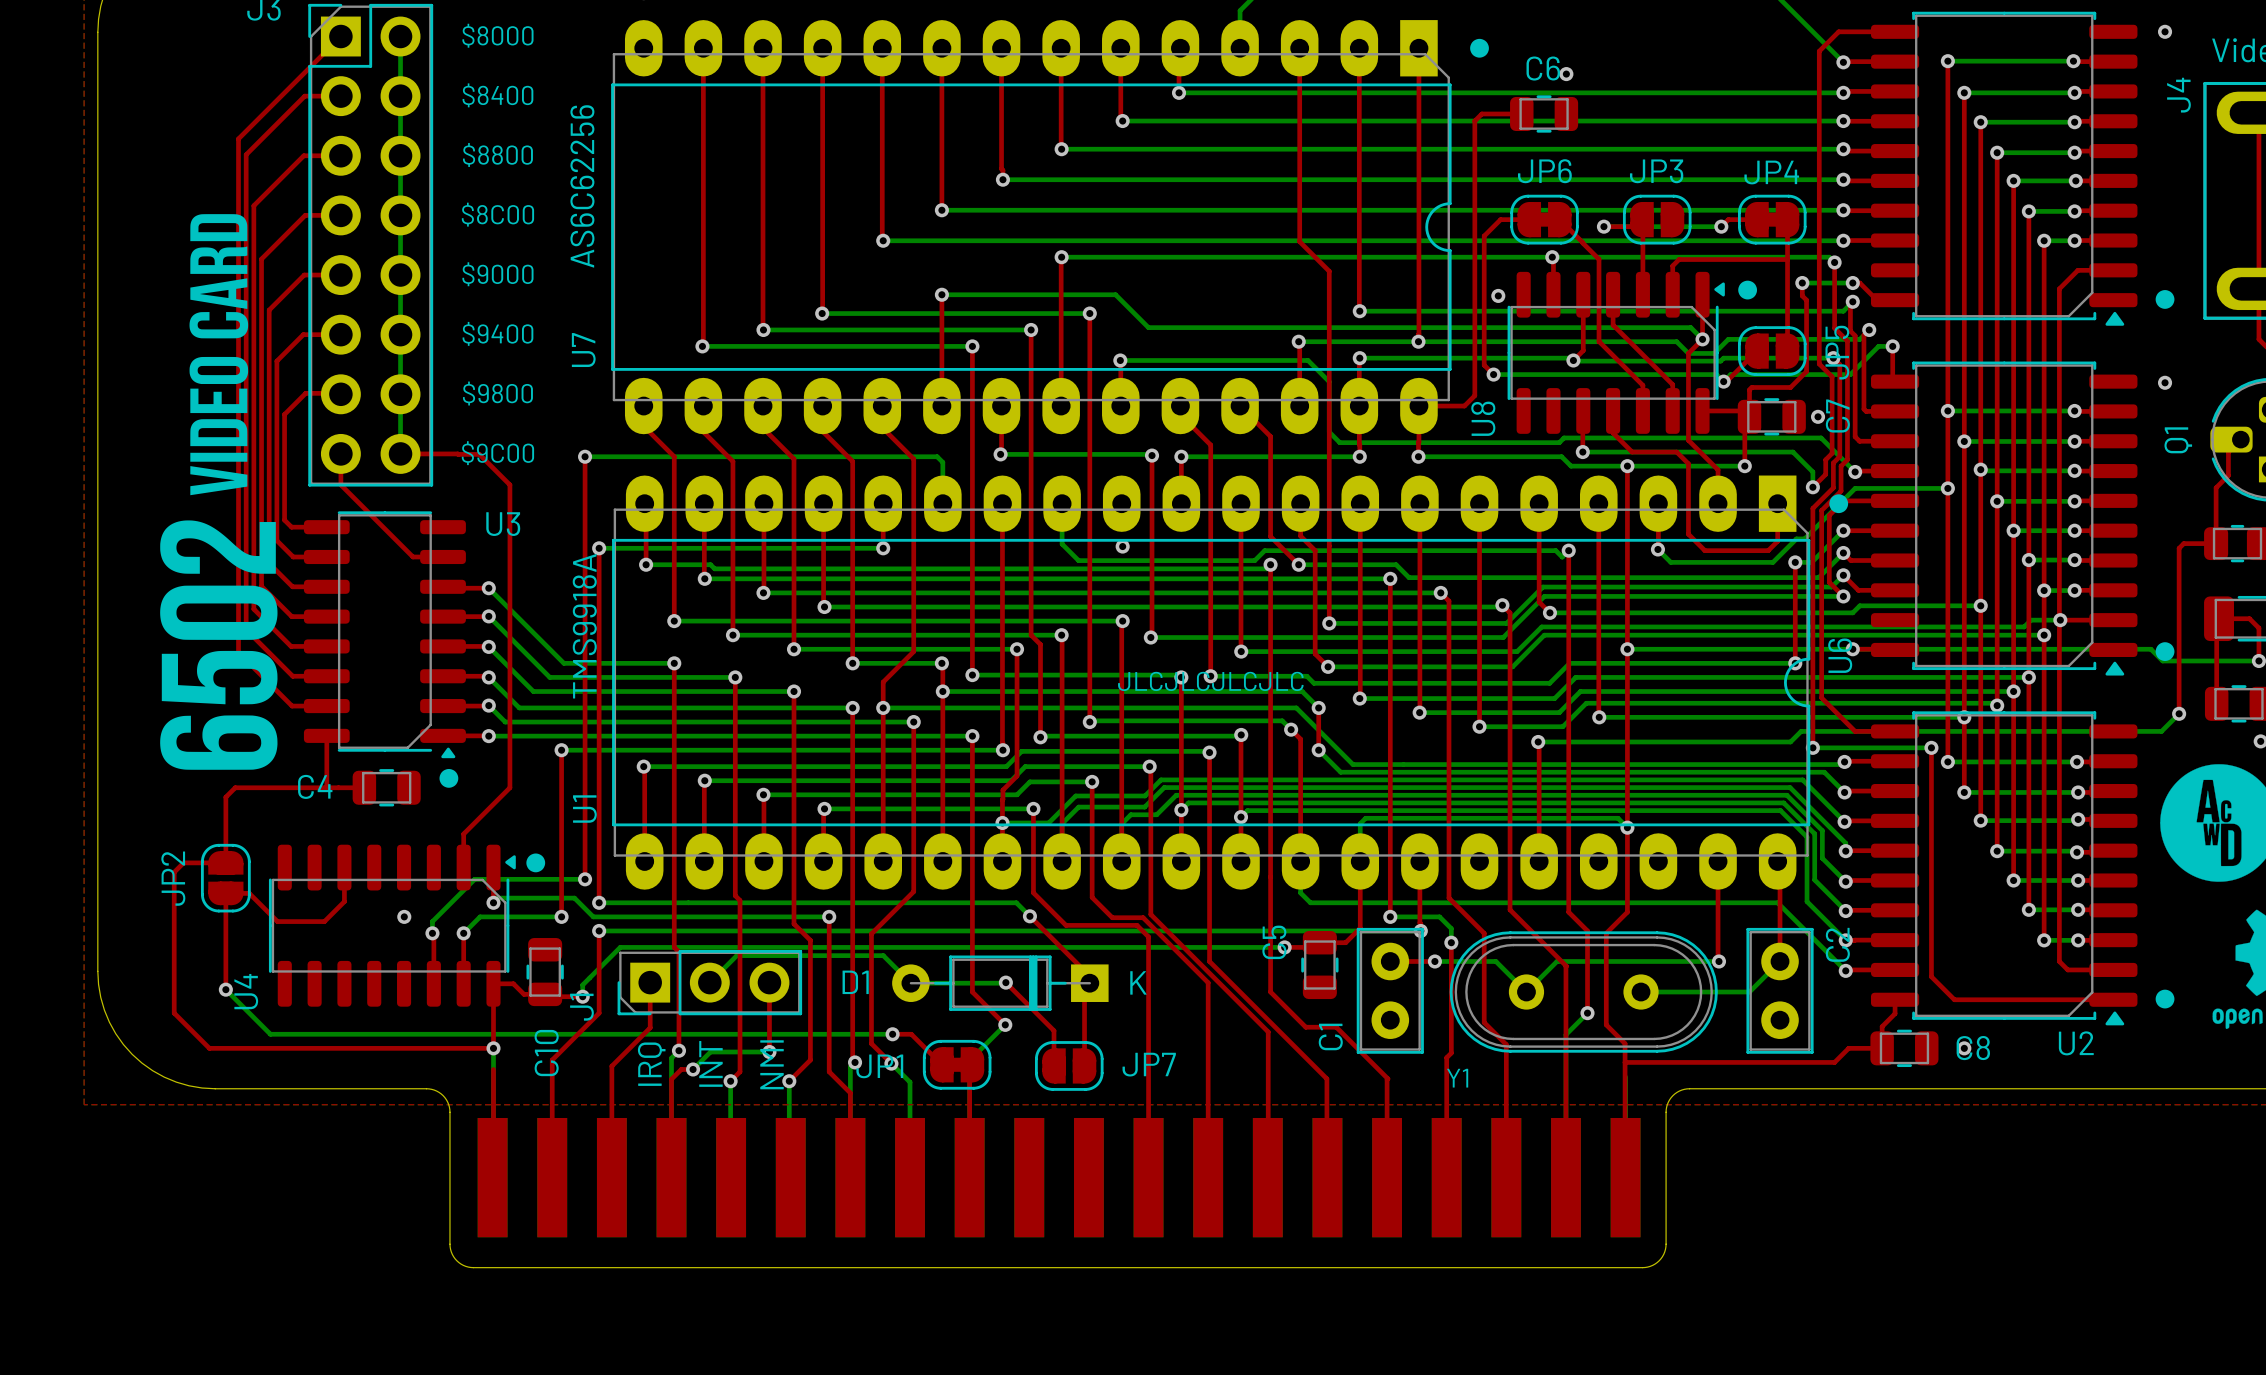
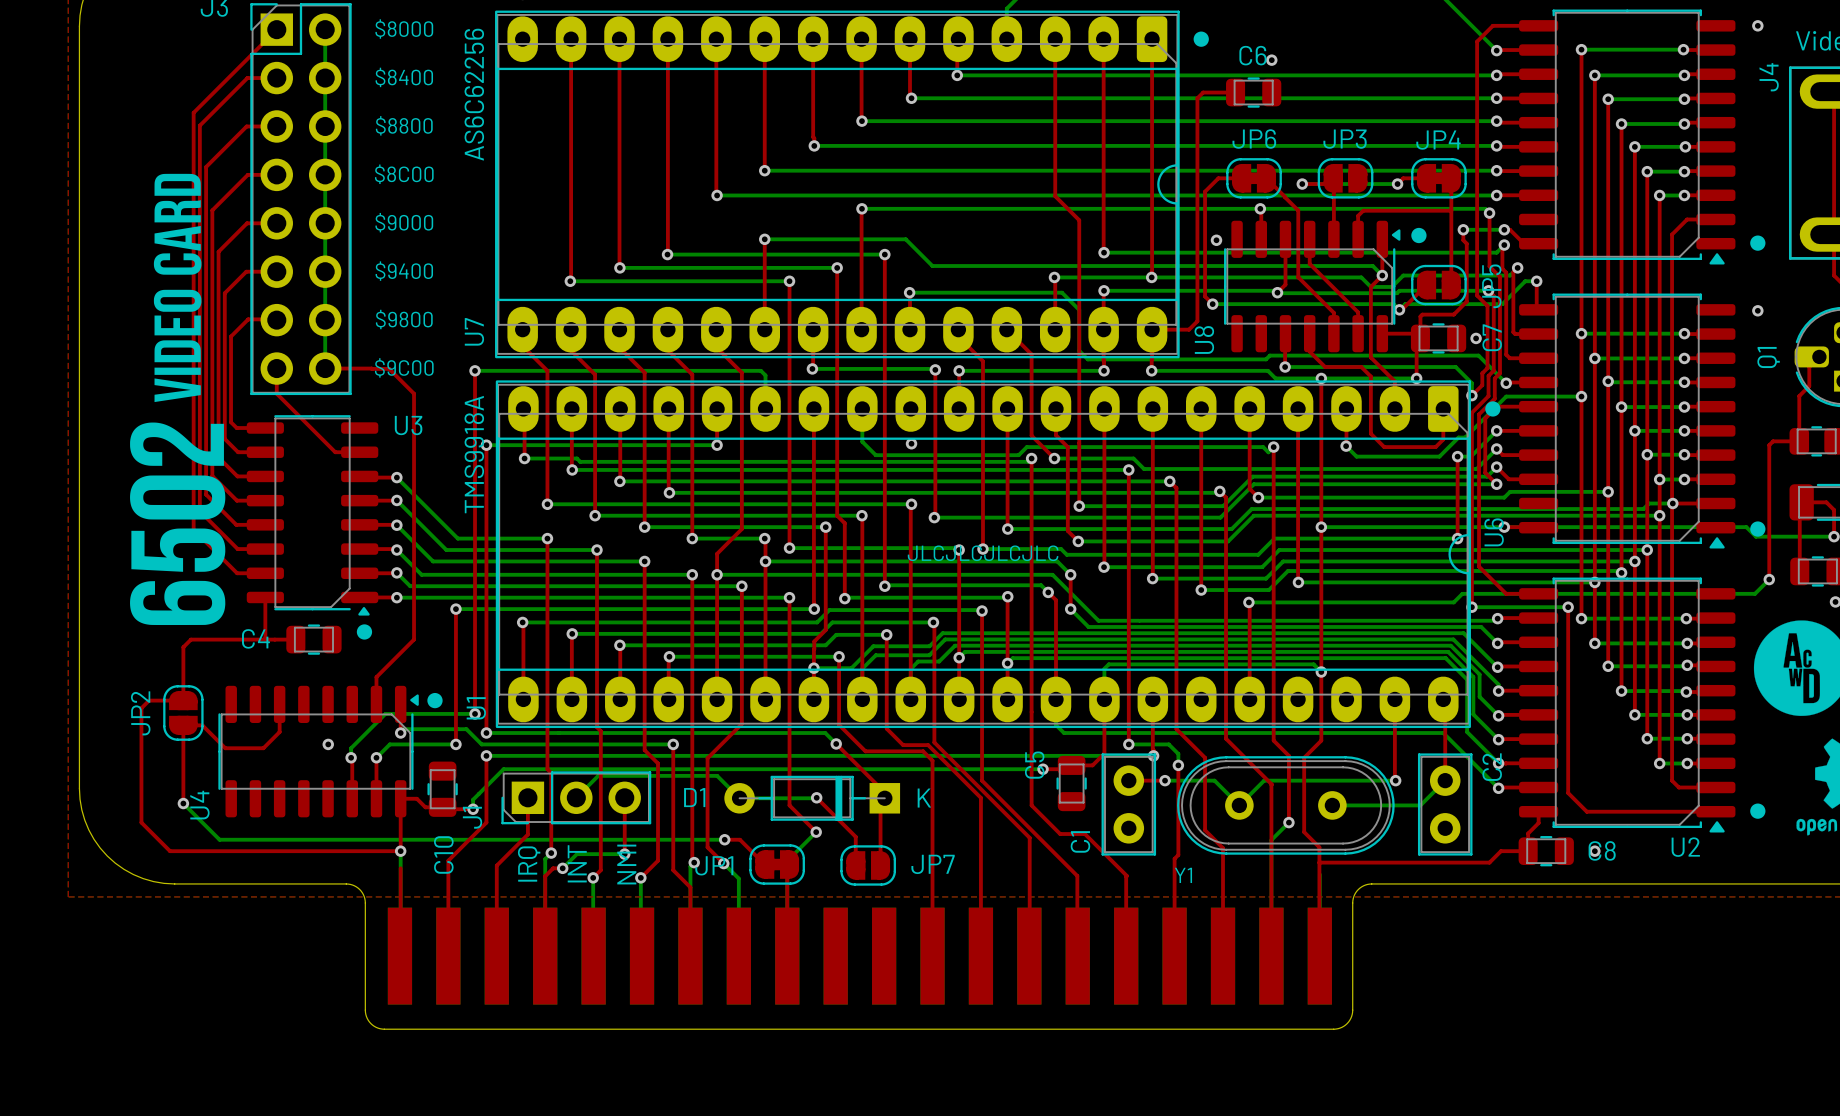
U7 footprint: [611, 20, 1452, 435] -> [495, 10, 1180, 359]
U7 value position: AS6C62256 (582, 186) -> AS6C62256 (474, 94)
U7 name position: U7 (583, 350) -> U7 (474, 331)
U1 footprint: [612, 475, 1811, 890] -> [495, 380, 1471, 729]
U1 value position: TMS9918A (584, 626) -> TMS9918A (474, 454)
U1 name position: U1 (584, 809) -> U1 (476, 708)

